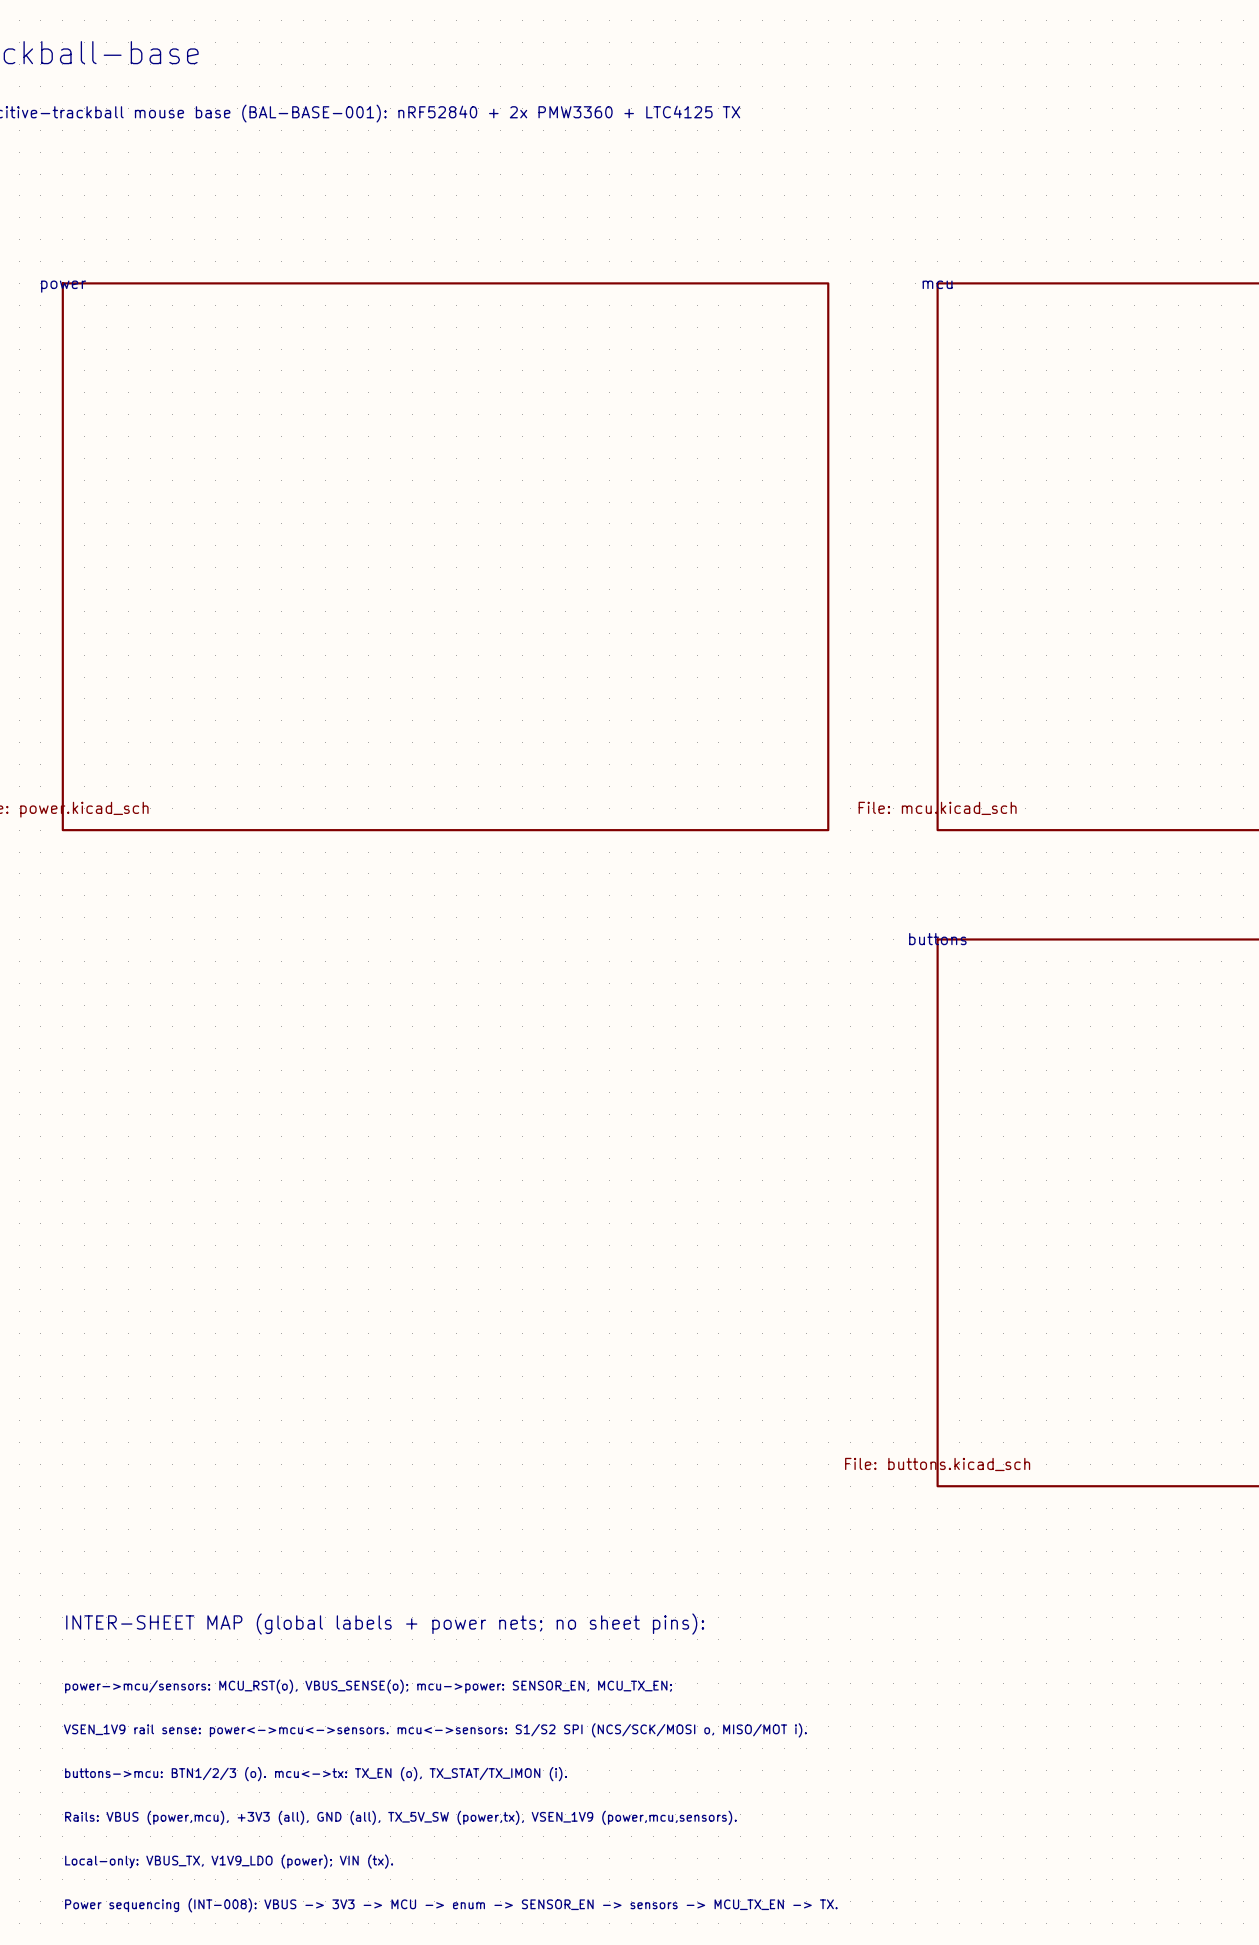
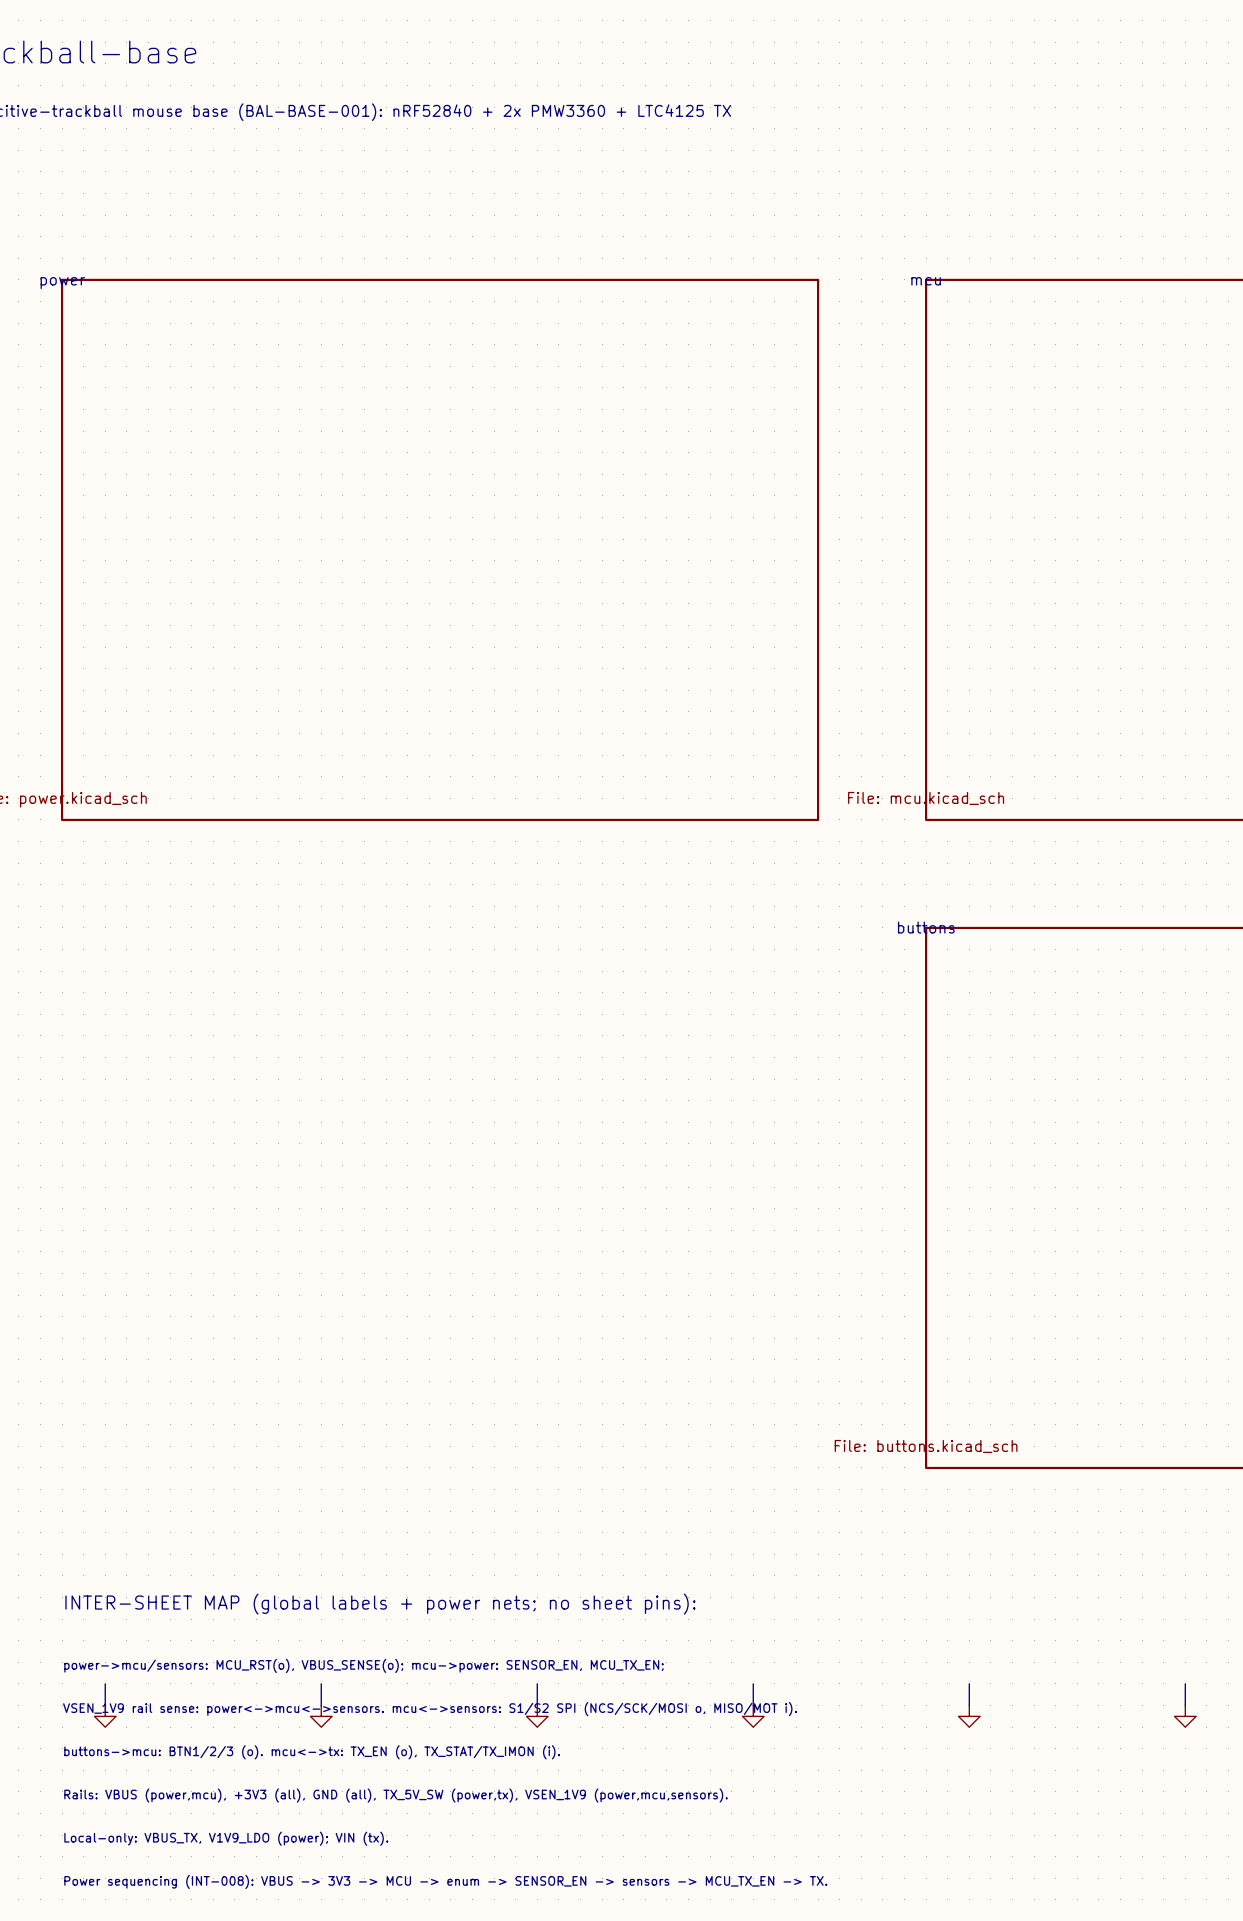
wire: none -> (105, 1683) (105, 1705)
wire: none -> (321, 1683) (321, 1705)
wire: none -> (537, 1683) (537, 1705)
wire: none -> (753, 1683) (753, 1705)
wire: none -> (969, 1683) (969, 1705)
wire: none -> (1185, 1683) (1185, 1705)
power symbol: none -> (105, 1716)
power symbol: none -> (321, 1716)
power symbol: none -> (537, 1716)
power symbol: none -> (753, 1716)
power symbol: none -> (969, 1716)
power symbol: none -> (1185, 1716)

